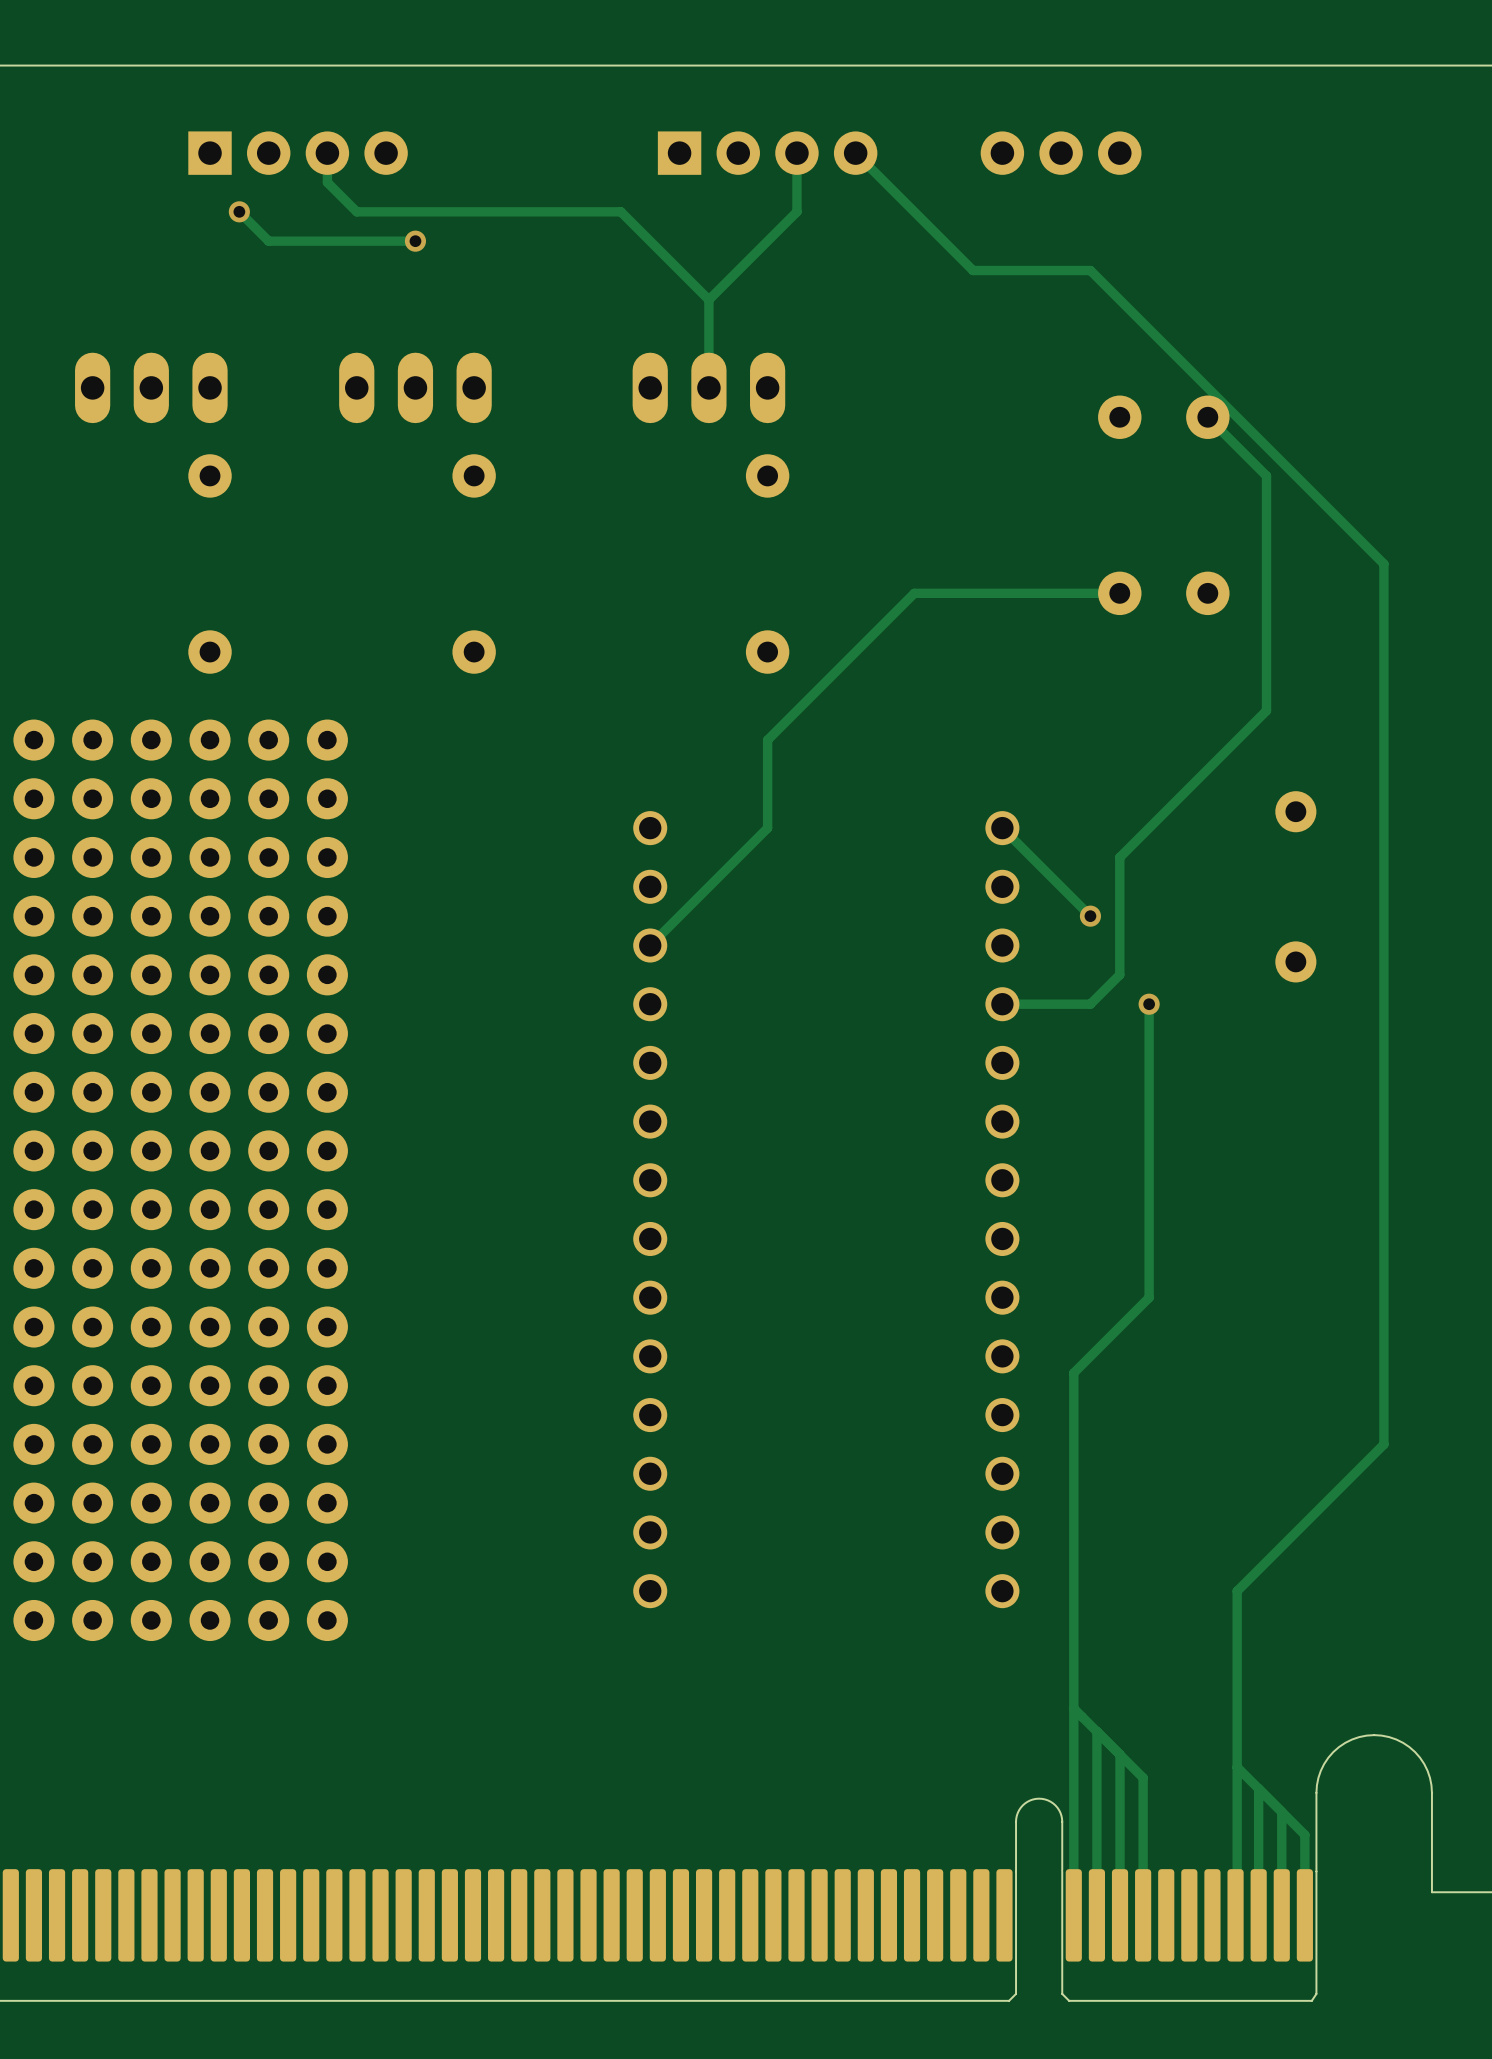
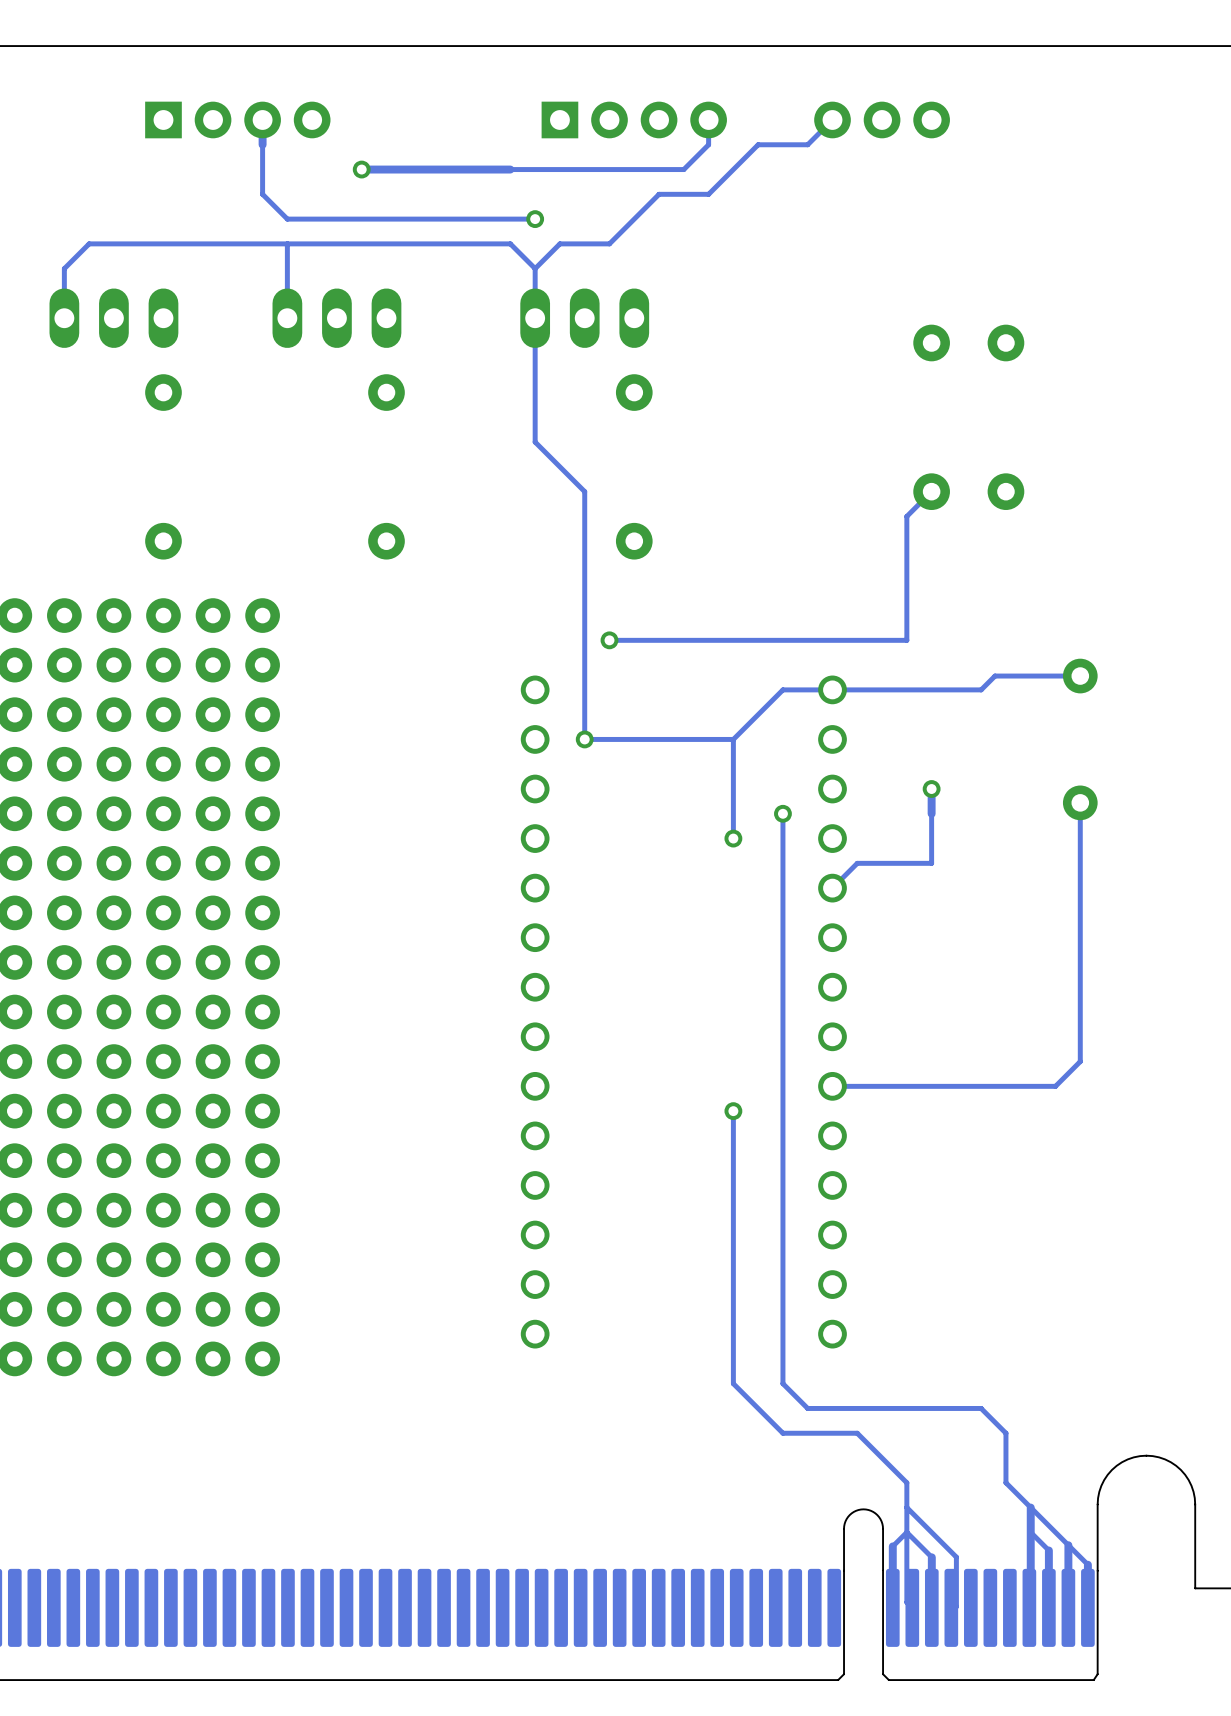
track: (796, 153) (796, 211) (708, 299) -> none
track: (855, 153) (973, 270) (1090, 270) (1383, 563) (1383, 1444) (1237, 1591) (1237, 1796) -> none
track: none -> (832, 119) (807, 144) (758, 144) (708, 194) (659, 194) (609, 243) (559, 243) (535, 268)
track: (327, 182) (356, 211) (444, 211) -> (262, 144) (262, 194) (287, 219) (535, 219)
track: (239, 211) (268, 241) (415, 241) -> none
via: (239, 211) -> none
track: (620, 211) (708, 299) -> (510, 169) (683, 169) (708, 144) (708, 119)
via position: (415, 241) -> (361, 169)
via: none -> (535, 219)
track: (708, 299) (708, 387) -> (287, 243) (287, 318)
track: none -> (535, 268) (535, 442) (584, 491) (584, 739) (733, 739)
track: none -> (535, 268) (510, 243) (89, 243) (64, 268) (64, 318)
track: (1207, 417) (1266, 475) (1266, 710) (1119, 857) (1119, 945) -> none
track: (1119, 593) (914, 593) (767, 740) (767, 828) (650, 945) -> (931, 491) (906, 516) (906, 640) (609, 640)
via: none -> (609, 640)
track: none -> (1080, 676) (995, 676) (981, 689) (782, 689) (733, 739)
track: (1002, 828) (1090, 916) -> none
via: none -> (584, 739)
track: none -> (733, 739) (733, 838)
via: (1090, 916) -> none
via: none -> (931, 789)
track: none -> (1080, 802) (1080, 1061) (1055, 1086) (832, 1086)
via: none -> (782, 813)
track: (1119, 974) (1090, 1004) (1002, 1004) -> (931, 813) (931, 863) (857, 863) (832, 888)
via: none -> (733, 838)
track: (1149, 1004) (1149, 1297) (1073, 1373) (1073, 1842) -> none
via: (1149, 1004) -> none
via: none -> (733, 1111)
track: (1073, 1708) (1143, 1777) (1143, 1915) -> (906, 1507) (956, 1557) (956, 1606) (951, 1607)
track: (1096, 1731) (1096, 1915) -> (733, 1111) (733, 1383) (782, 1433) (857, 1433) (906, 1482) (906, 1602) (912, 1607)
track: (1120, 1754) (1120, 1855) -> (892, 1546) (906, 1532) (931, 1557)
track: (1237, 1767) (1304, 1834) (1304, 1864) -> (782, 813) (782, 1383) (807, 1408) (981, 1408) (1005, 1433) (1005, 1482) (1087, 1564)
track: (1258, 1788) (1258, 1847) -> (1030, 1532) (1048, 1550)
track: (1281, 1811) (1281, 1841) -> none

